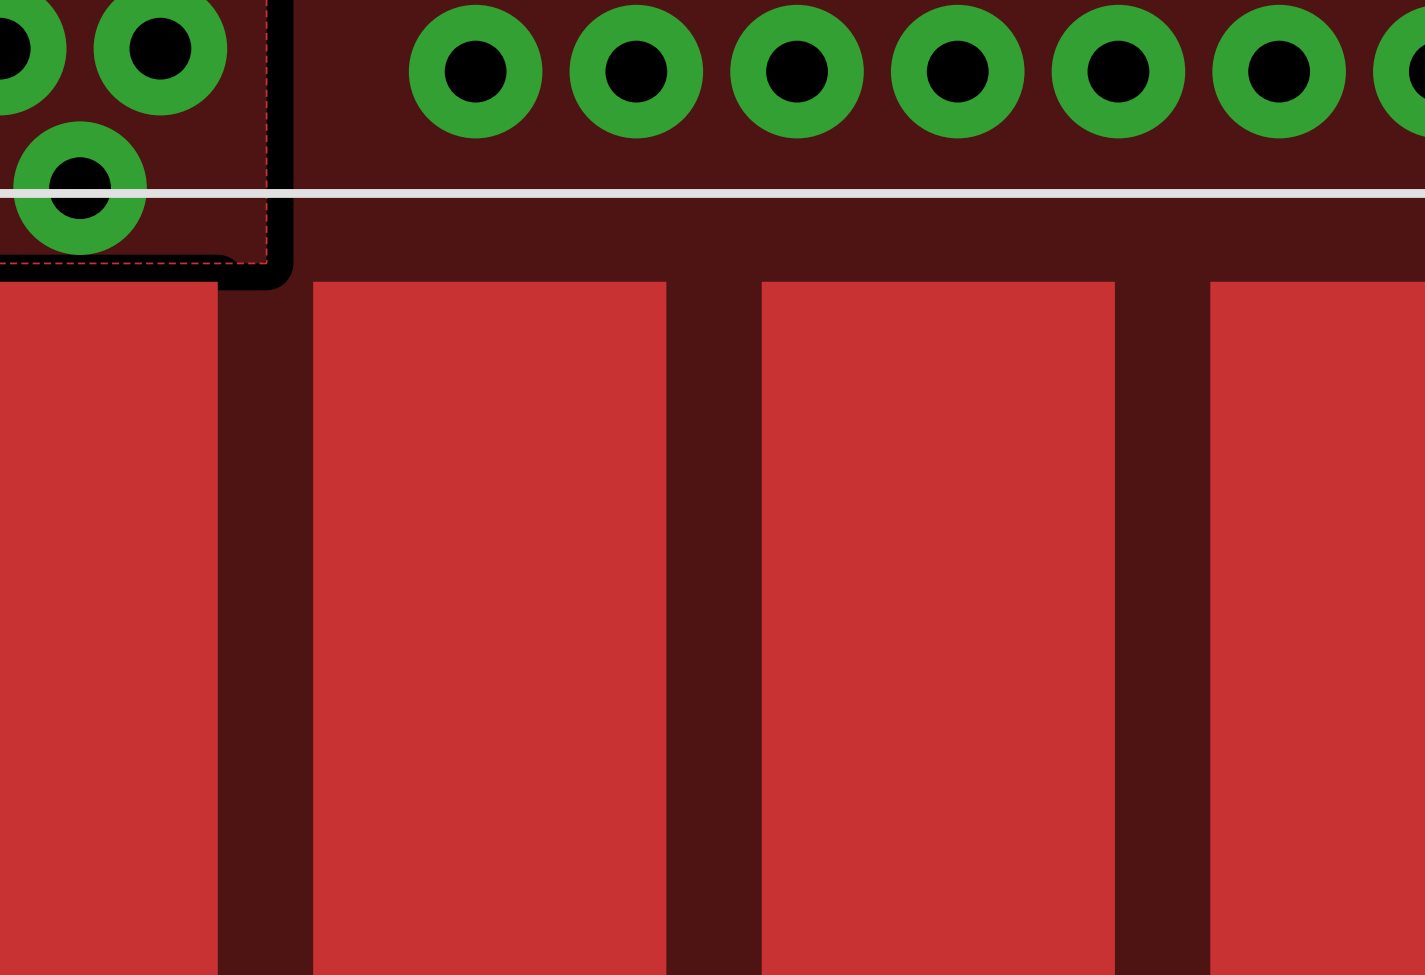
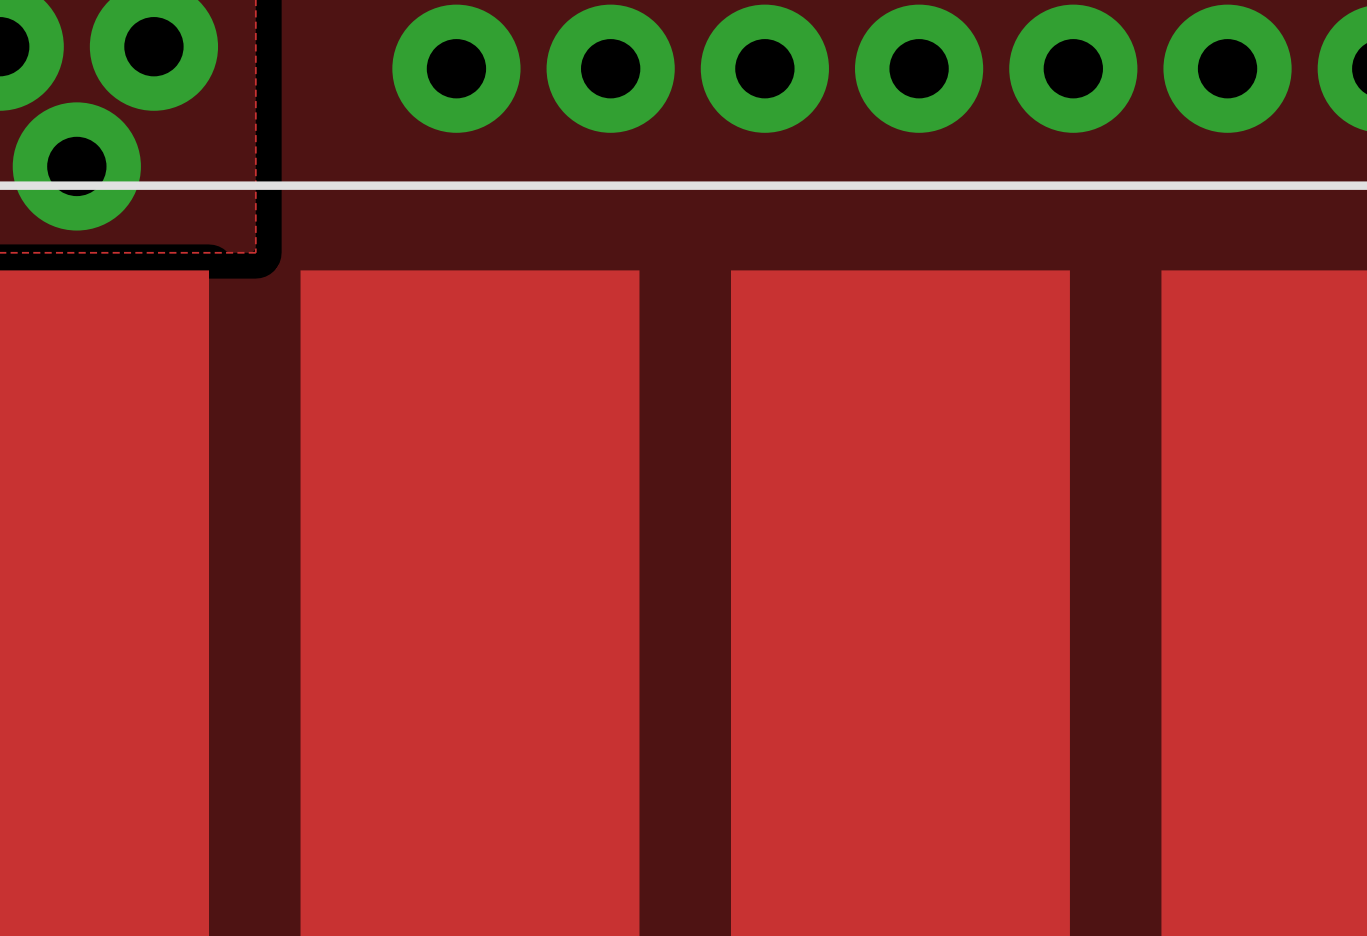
via position: (80, 188) -> (76, 166)

